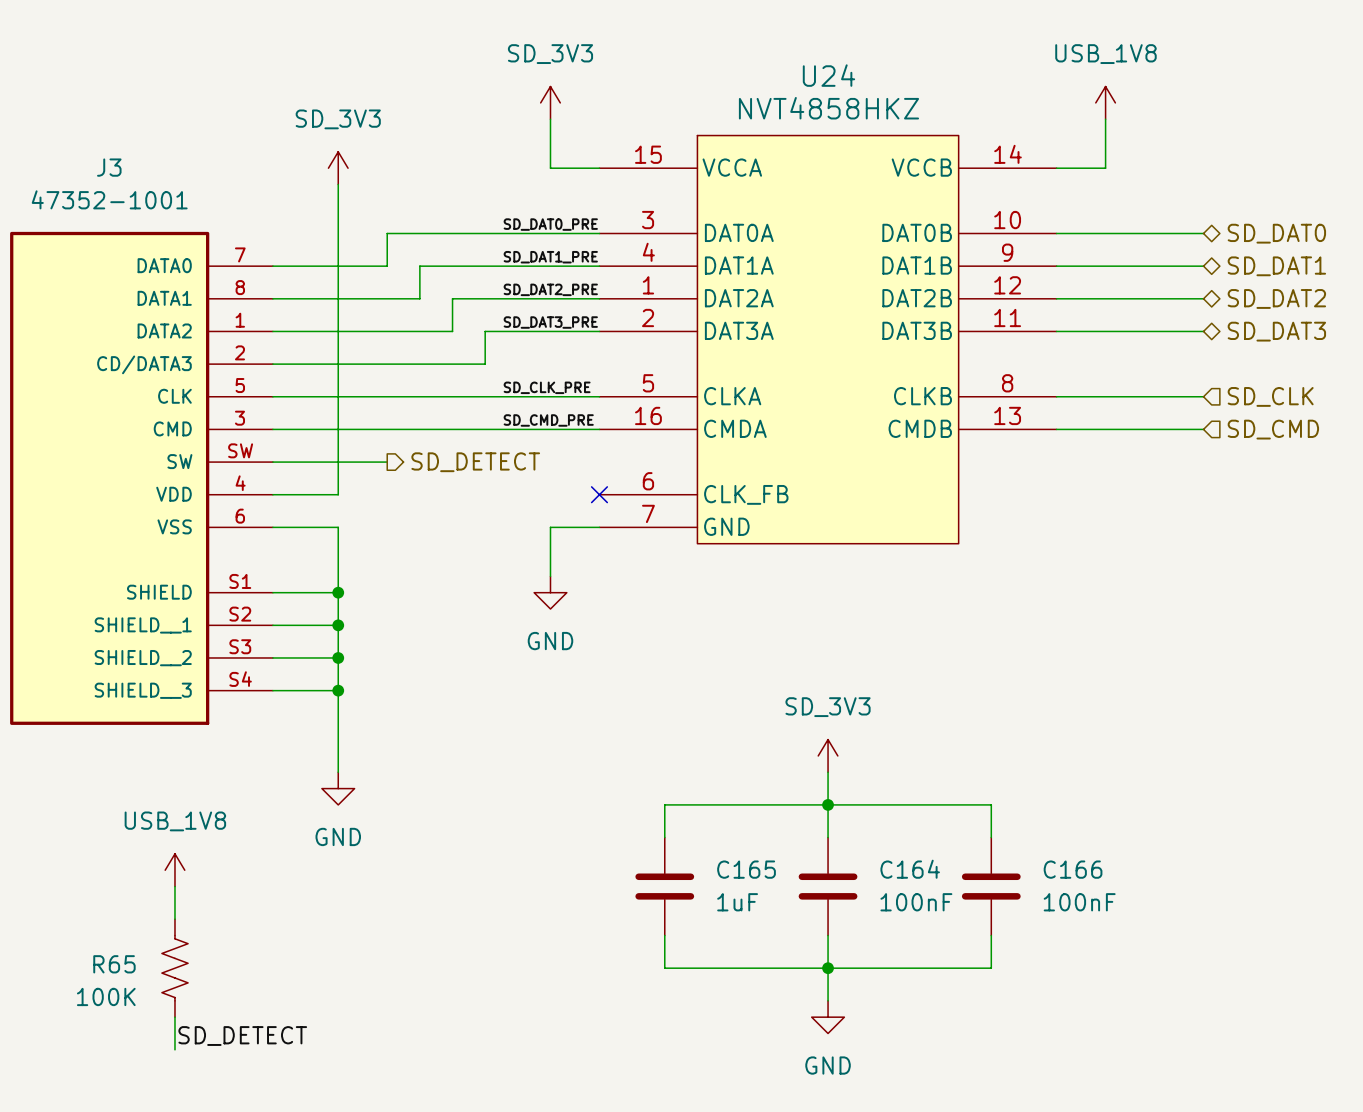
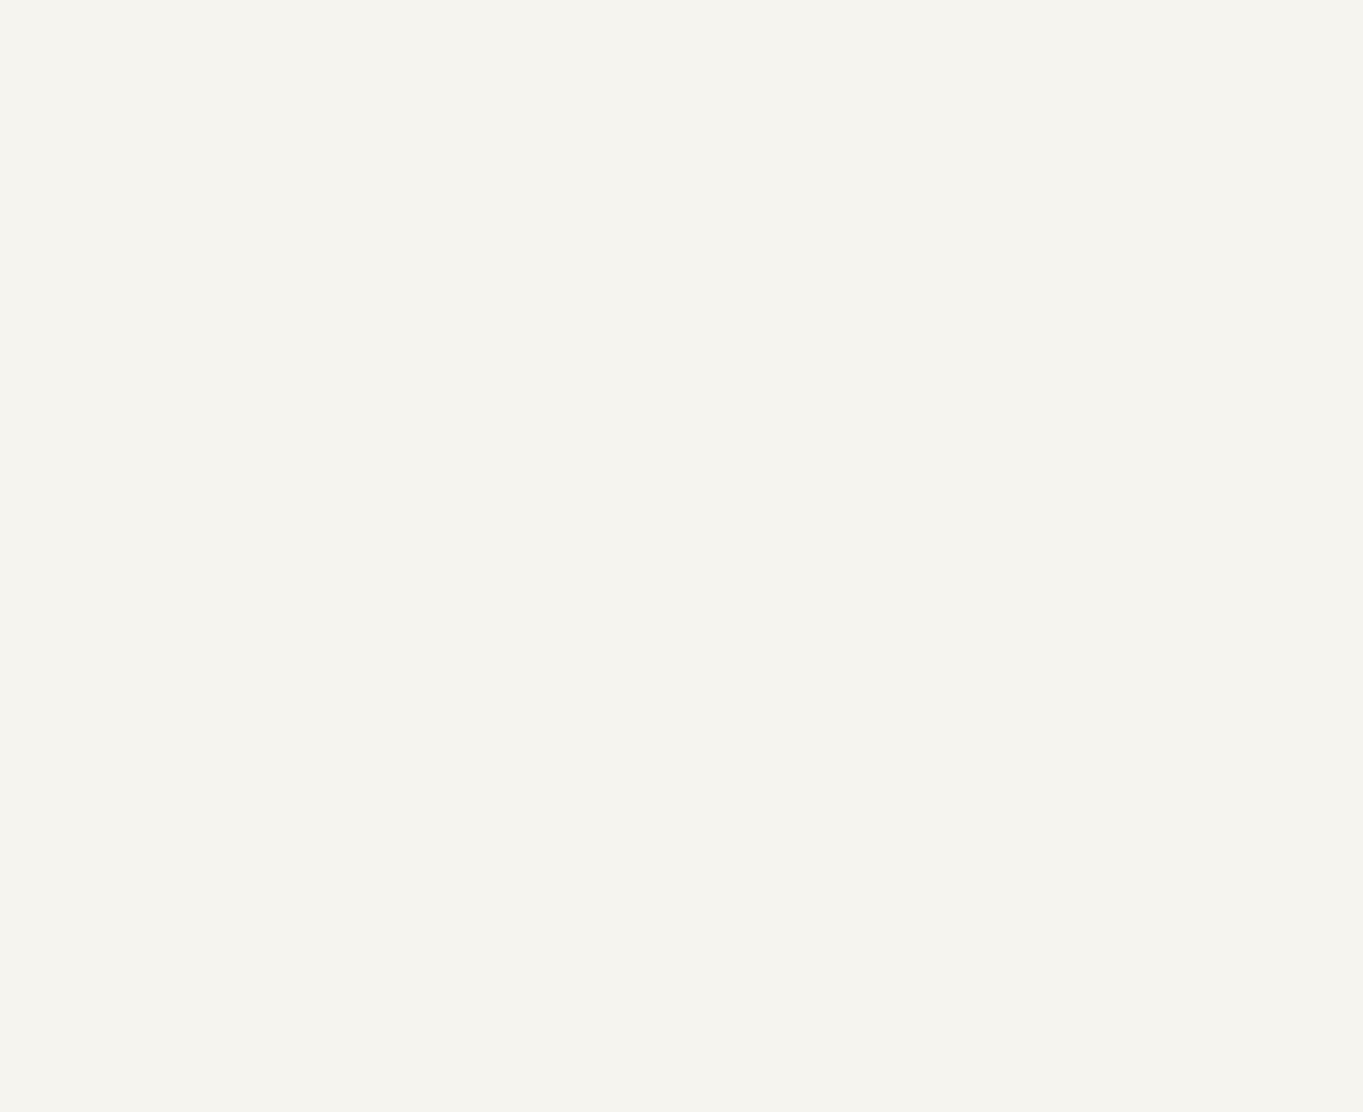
power symbol: SD_3V3 (550, 102) -> none
power symbol: USB_1V8 (1105, 102) -> none
wire: (550, 119) (550, 168) (599, 168) -> none
wire: (1105, 119) (1105, 168) (1056, 168) -> none
power symbol: SD_3V3 (338, 168) -> none
wire: (338, 184) (338, 494) (272, 494) -> none
label: SD_DAT0_PRE (550, 224) -> none
wire: (599, 233) (387, 233) (387, 266) (272, 266) -> none
wire: (1056, 233) (1203, 233) -> none
hierarchical label: SD_DAT0 (1276, 233) -> none
label: SD_DAT1_PRE (550, 257) -> none
wire: (599, 266) (419, 266) (419, 298) (272, 298) -> none
wire: (1056, 266) (1203, 266) -> none
hierarchical label: SD_DAT1 (1276, 266) -> none
label: SD_DAT2_PRE (550, 289) -> none
wire: (599, 298) (452, 298) (452, 331) (272, 331) -> none
wire: (1056, 298) (1203, 298) -> none
hierarchical label: SD_DAT2 (1276, 298) -> none
label: SD_DAT3_PRE (550, 322) -> none
wire: (599, 331) (485, 331) (485, 364) (272, 364) -> none
wire: (1056, 331) (1203, 331) -> none
hierarchical label: SD_DAT3 (1276, 331) -> none
U24: NVT4858HKZ (828, 339) -> none
label: SD_CLK_PRE (547, 387) -> none
wire: (272, 396) (599, 396) -> none
wire: (1056, 396) (1203, 396) -> none
hierarchical label: SD_CLK (1270, 396) -> none
label: SD_CMD_PRE (548, 420) -> none
wire: (272, 429) (599, 429) -> none
wire: (1056, 429) (1203, 429) -> none
hierarchical label: SD_CMD (1273, 429) -> none
wire: (272, 462) (387, 462) -> none
hierarchical label: SD_DETECT (475, 462) -> none
J3: 47352-1001 (141, 478) -> none
no-connect mark: (599, 494) -> none
wire: (272, 527) (338, 527) (338, 772) -> none
wire: (599, 527) (550, 527) (550, 576) -> none
wire: (272, 592) (338, 592) -> none
junction: (338, 592) -> none
power symbol: GND (550, 592) -> none
wire: (272, 625) (338, 625) -> none
junction: (338, 625) -> none
wire: (272, 657) (338, 657) -> none
junction: (338, 657) -> none
wire: (272, 690) (338, 690) -> none
junction: (338, 690) -> none
power symbol: SD_3V3 (828, 755) -> none
wire: (828, 772) (828, 837) -> none
power symbol: GND (338, 788) -> none
junction: (828, 804) -> none
wire: (664, 837) (664, 804) (991, 804) (991, 837) -> none
power symbol: USB_1V8 (174, 870) -> none
wire: (174, 886) (174, 919) -> none
C165: 1uF (664, 886) -> none
C164: 100nF (828, 886) -> none
C166: 100nF (991, 886) -> none
wire: (664, 935) (664, 968) (991, 968) (991, 935) -> none
wire: (828, 935) (828, 1000) -> none
R65: 100K (174, 968) -> none
junction: (828, 968) -> none
wire: (174, 1017) (174, 1049) -> none
power symbol: GND (828, 1017) -> none
label: SD_DETECT (242, 1036) -> none

